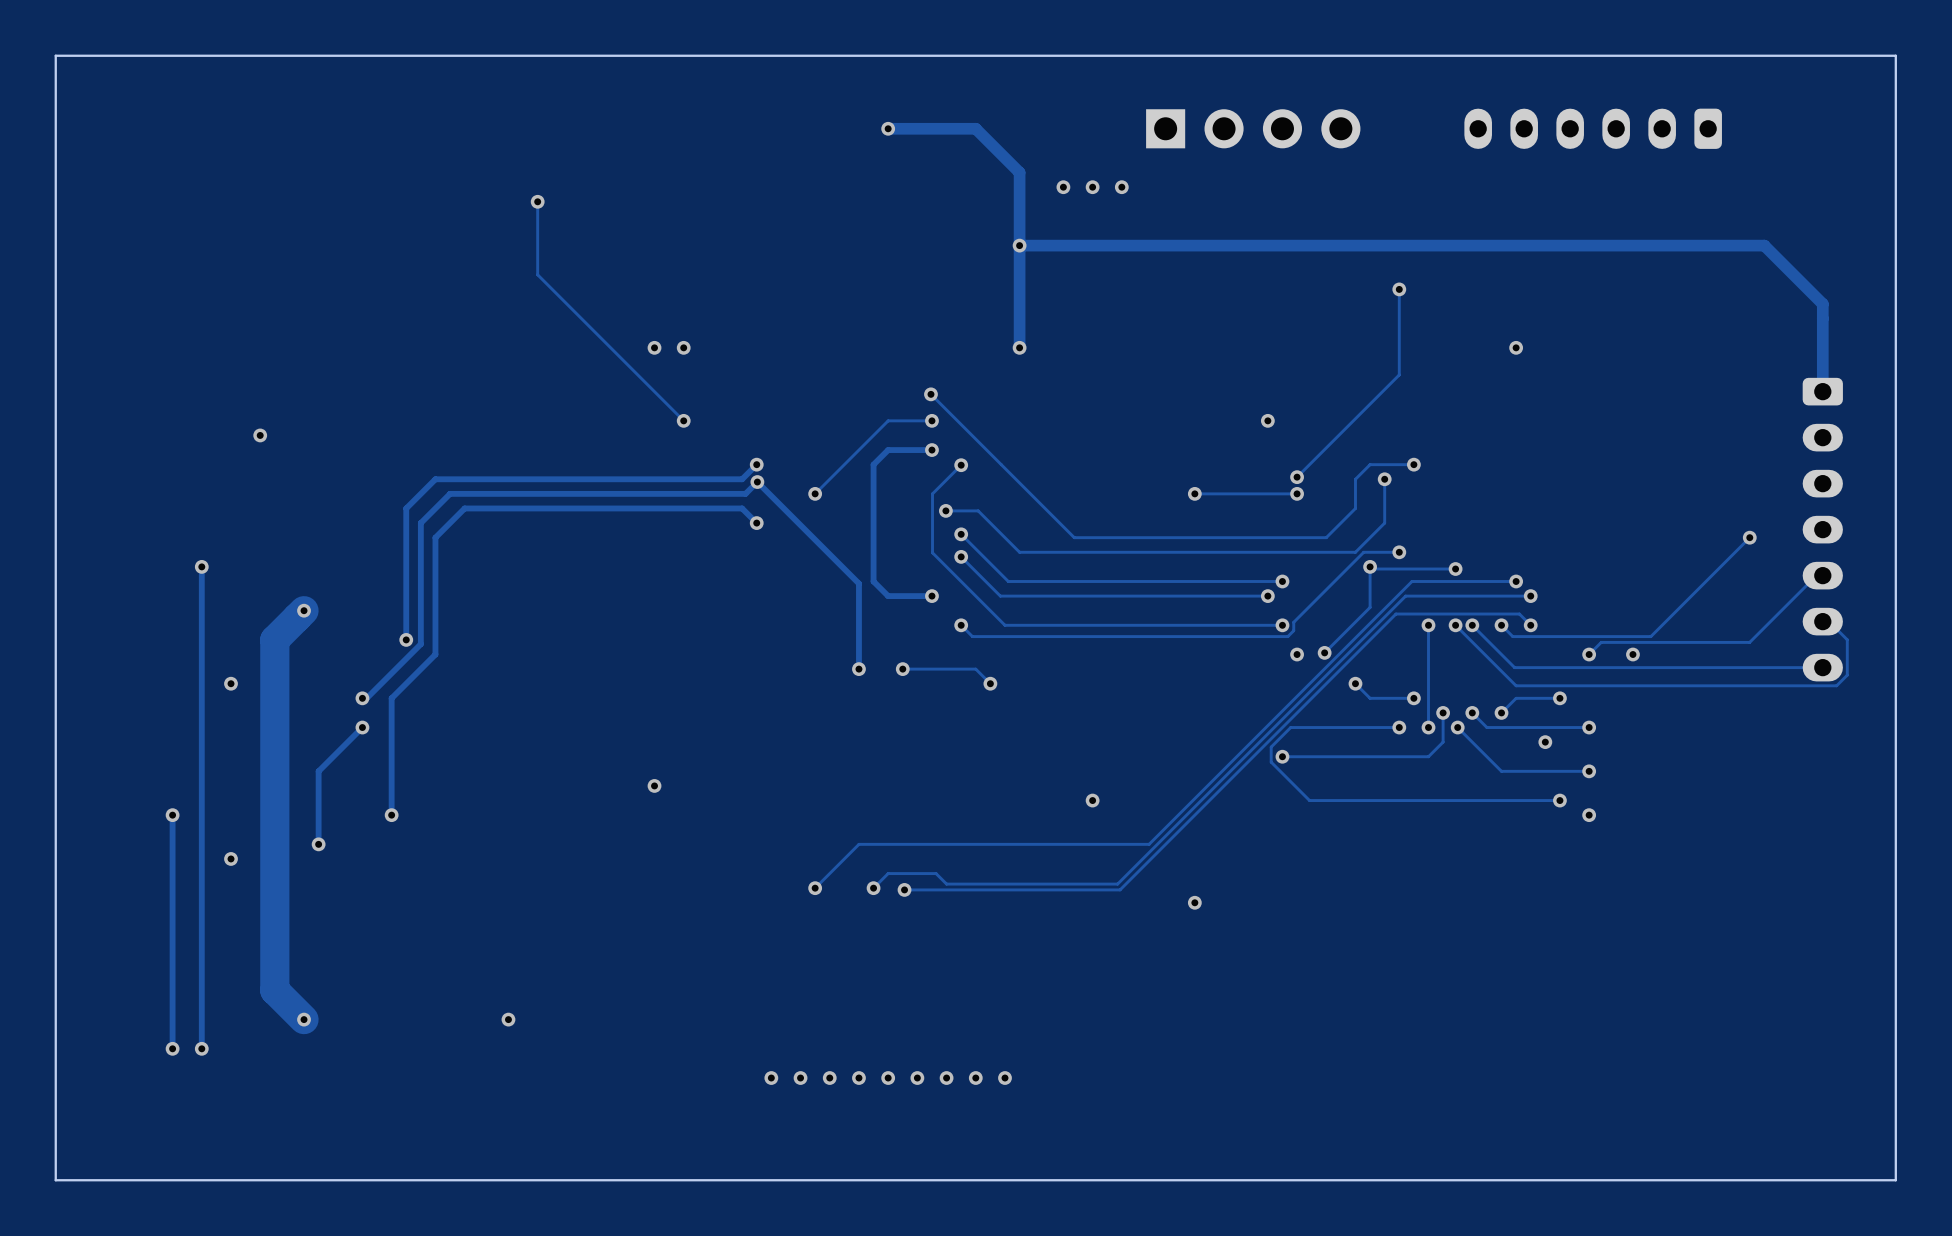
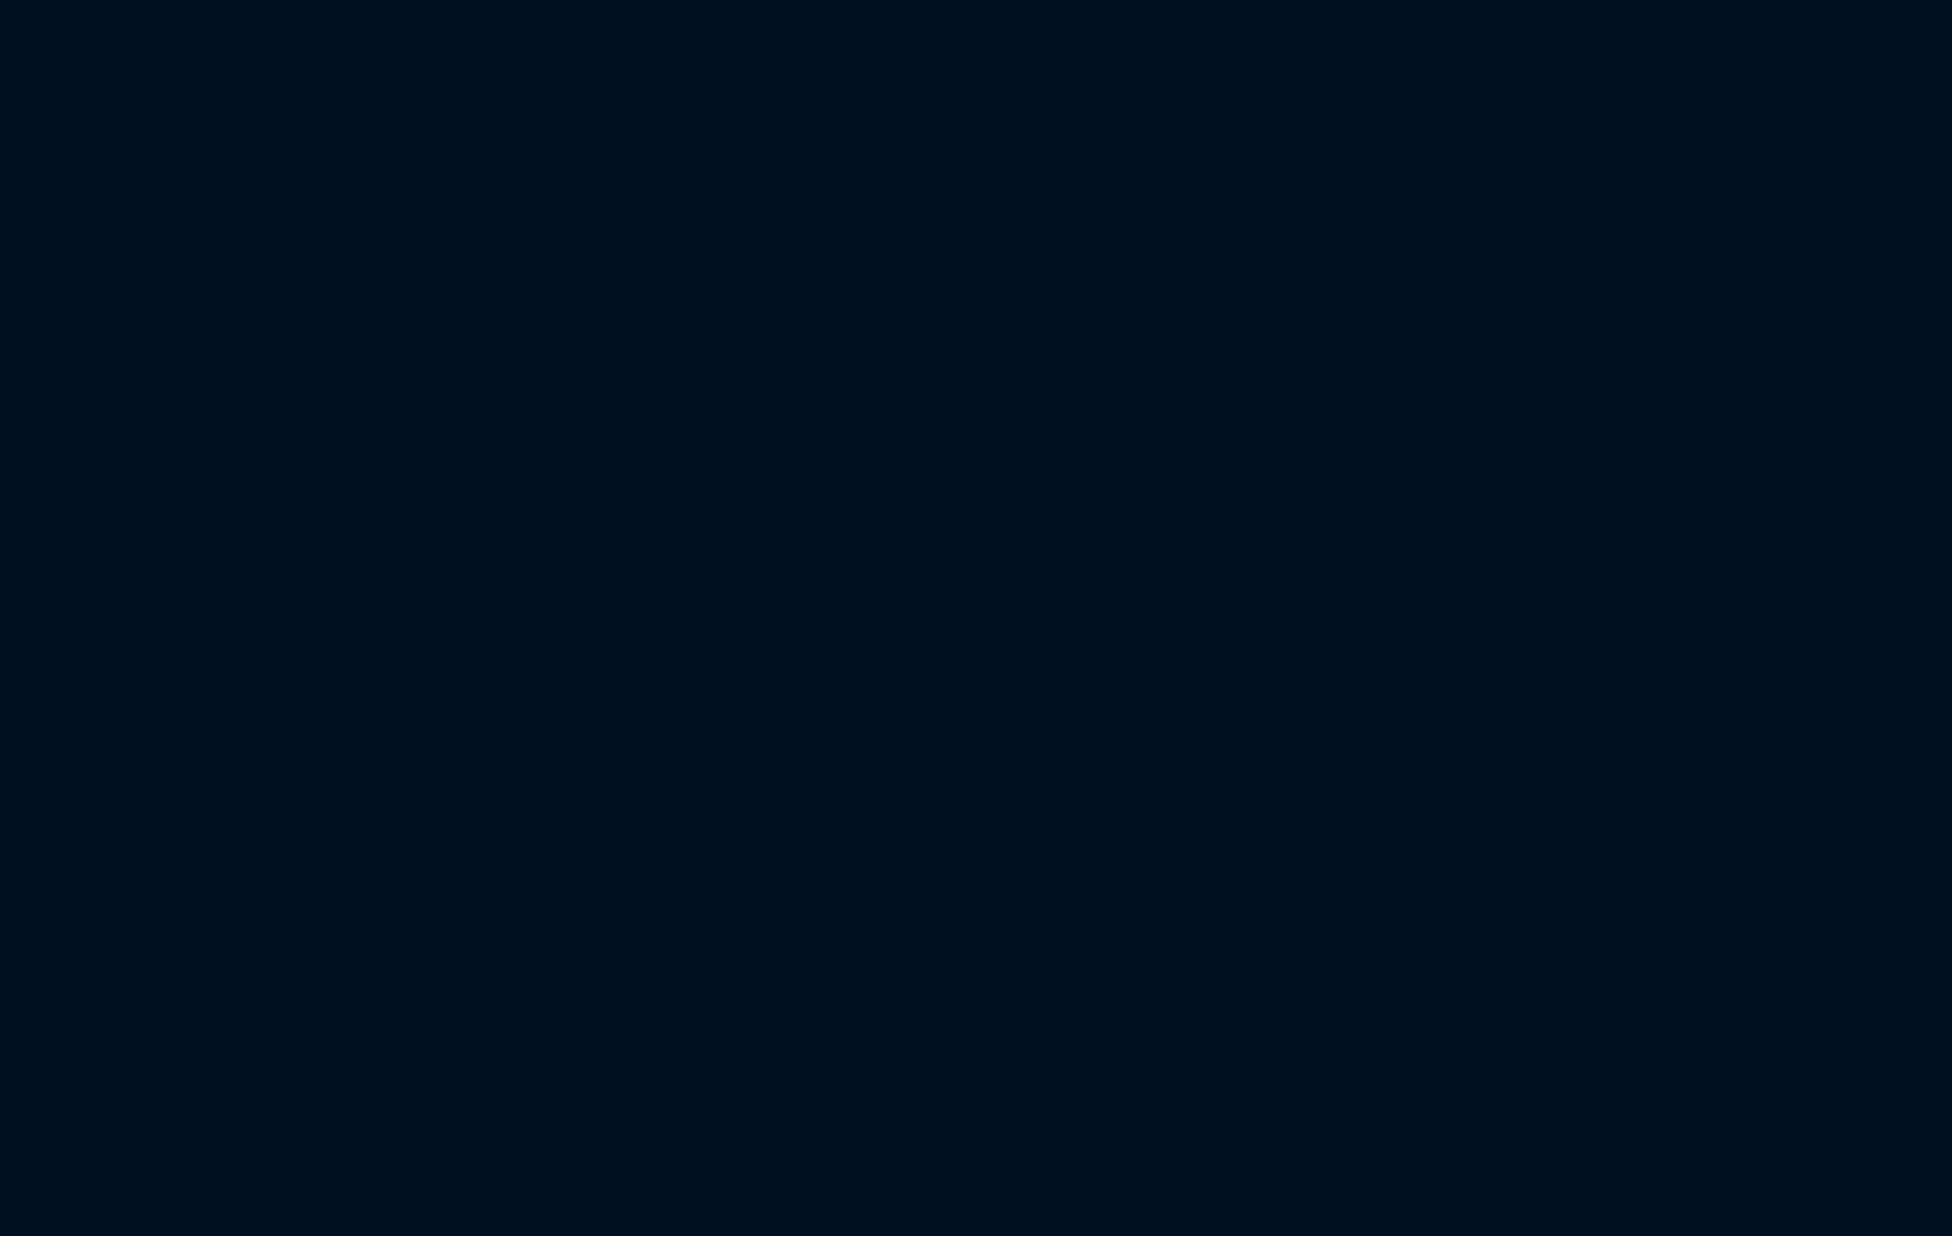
board edge: (1895, 55) (55, 55) (55, 1180) (1895, 1180) (1895, 55) -> none
track: (888, 128) (975, 128) (1019, 172) (1019, 347) -> none
via: (888, 128) -> none
part: (1253, 128) -> none
part: (1593, 128) -> none
via: (1063, 187) -> none
via: (1092, 187) -> none
via: (1121, 187) -> none
track: (537, 201) (537, 274) (683, 420) -> none
via: (537, 201) -> none
track: (1019, 245) (1764, 245) (1822, 304) (1822, 391) -> none
via: (1019, 245) -> none
track: (1399, 289) (1399, 374) (1297, 477) -> none
via: (1399, 289) -> none
via: (654, 347) -> none
via: (683, 347) -> none
via: (1019, 347) -> none
via: (1516, 347) -> none
track: (930, 394) (1074, 537) (1326, 537) (1355, 508) (1355, 479) (1370, 464) (1413, 464) -> none
via: (930, 394) -> none
via: (683, 420) -> none
track: (931, 420) (888, 420) (815, 493) -> none
via: (931, 420) -> none
via: (1267, 420) -> none
via: (260, 435) -> none
track: (931, 450) (888, 450) (873, 464) (873, 581) (888, 596) (931, 596) -> none
via: (931, 450) -> none
track: (756, 464) (742, 479) (435, 479) (406, 508) (406, 639) -> none
via: (756, 464) -> none
via: (1413, 464) -> none
track: (961, 465) (932, 493) (932, 552) (1005, 625) (1282, 625) -> none
via: (961, 465) -> none
via: (1297, 477) -> none
track: (1384, 479) (1384, 523) (1355, 552) (1019, 552) (978, 510) (945, 510) -> none
via: (1384, 479) -> none
via: (757, 482) -> none
via: (815, 493) -> none
via: (1194, 493) -> none
track: (1297, 493) (1194, 493) -> none
via: (1297, 493) -> none
via: (945, 510) -> none
track: (756, 523) (742, 508) (464, 508) (435, 537) (435, 654) (391, 698) (391, 815) -> none
via: (756, 523) -> none
part: (1822, 529) -> none
track: (961, 534) (1008, 581) (1282, 581) -> none
via: (961, 534) -> none
track: (1749, 537) (1650, 636) (1512, 636) (1501, 625) -> none
via: (1749, 537) -> none
track: (1399, 552) (1363, 552) (1293, 622) (1293, 630) (1287, 636) (972, 636) (961, 625) -> none
via: (1399, 552) -> none
track: (961, 556) (1000, 596) (1267, 596) -> none
via: (961, 556) -> none
track: (201, 566) (201, 1048) -> none
via: (201, 566) -> none
via: (1370, 566) -> none
track: (1455, 569) (1372, 569) (1370, 566) (1370, 607) (1324, 652) -> none
via: (1455, 569) -> none
track: (1822, 575) (1816, 575) (1749, 642) (1601, 642) (1589, 654) -> none
via: (1282, 581) -> none
track: (1516, 581) (1411, 581) (1149, 844) (858, 844) (815, 888) -> none
via: (1516, 581) -> none
via: (931, 596) -> none
via: (1267, 596) -> none
track: (1530, 596) (1405, 596) (1117, 884) (946, 884) (936, 873) (888, 873) (873, 888) -> none
via: (1530, 596) -> none
track: (304, 610) (274, 639) (274, 990) (304, 1019) -> none
via: (304, 610) -> none
track: (1822, 621) (1829, 621) (1847, 639) (1847, 675) (1836, 685) (1516, 685) (1455, 625) -> none
via: (961, 625) -> none
via: (1282, 625) -> none
track: (1428, 625) (1428, 727) -> none
via: (1428, 625) -> none
via: (1455, 625) -> none
track: (1472, 625) (1514, 667) (1822, 667) -> none
via: (1472, 625) -> none
via: (1501, 625) -> none
track: (1530, 625) (1519, 614) (1395, 614) (1120, 889) (904, 889) -> none
via: (1530, 625) -> none
via: (406, 639) -> none
via: (1324, 652) -> none
via: (1297, 654) -> none
via: (1589, 654) -> none
via: (1632, 654) -> none
track: (858, 669) (858, 583) (757, 482) (745, 493) (450, 493) (420, 523) (420, 644) (366, 698) (362, 698) -> none
via: (858, 669) -> none
track: (902, 669) (975, 669) (990, 683) -> none
via: (902, 669) -> none
via: (231, 683) -> none
via: (990, 683) -> none
track: (1355, 683) (1370, 698) (1413, 698) -> none
via: (1355, 683) -> none
via: (362, 698) -> none
via: (1413, 698) -> none
track: (1559, 698) (1516, 698) (1501, 712) -> none
via: (1559, 698) -> none
track: (1443, 712) (1443, 742) (1428, 756) (1282, 756) -> none
via: (1443, 712) -> none
track: (1472, 712) (1486, 727) (1589, 727) -> none
via: (1472, 712) -> none
via: (1501, 712) -> none
track: (362, 727) (318, 771) (318, 844) -> none
via: (362, 727) -> none
track: (1399, 727) (1290, 727) (1271, 747) (1271, 762) (1309, 800) (1559, 800) -> none
via: (1399, 727) -> none
via: (1428, 727) -> none
track: (1457, 727) (1501, 771) (1589, 771) -> none
via: (1457, 727) -> none
via: (1589, 727) -> none
via: (1545, 742) -> none
via: (1282, 756) -> none
via: (1589, 771) -> none
via: (654, 785) -> none
via: (1092, 800) -> none
via: (1559, 800) -> none
track: (172, 815) (172, 1048) -> none
via: (172, 815) -> none
via: (391, 815) -> none
via: (1589, 815) -> none
via: (318, 844) -> none
via: (231, 858) -> none
via: (815, 888) -> none
via: (873, 888) -> none
via: (904, 889) -> none
via: (1194, 902) -> none
via: (304, 1019) -> none
via: (508, 1019) -> none
via: (172, 1048) -> none
via: (201, 1048) -> none
via: (771, 1078) -> none
via: (800, 1078) -> none
via: (829, 1078) -> none
via: (858, 1078) -> none
via: (888, 1078) -> none
via: (917, 1078) -> none
via: (946, 1078) -> none
via: (975, 1078) -> none
via: (1005, 1078) -> none

